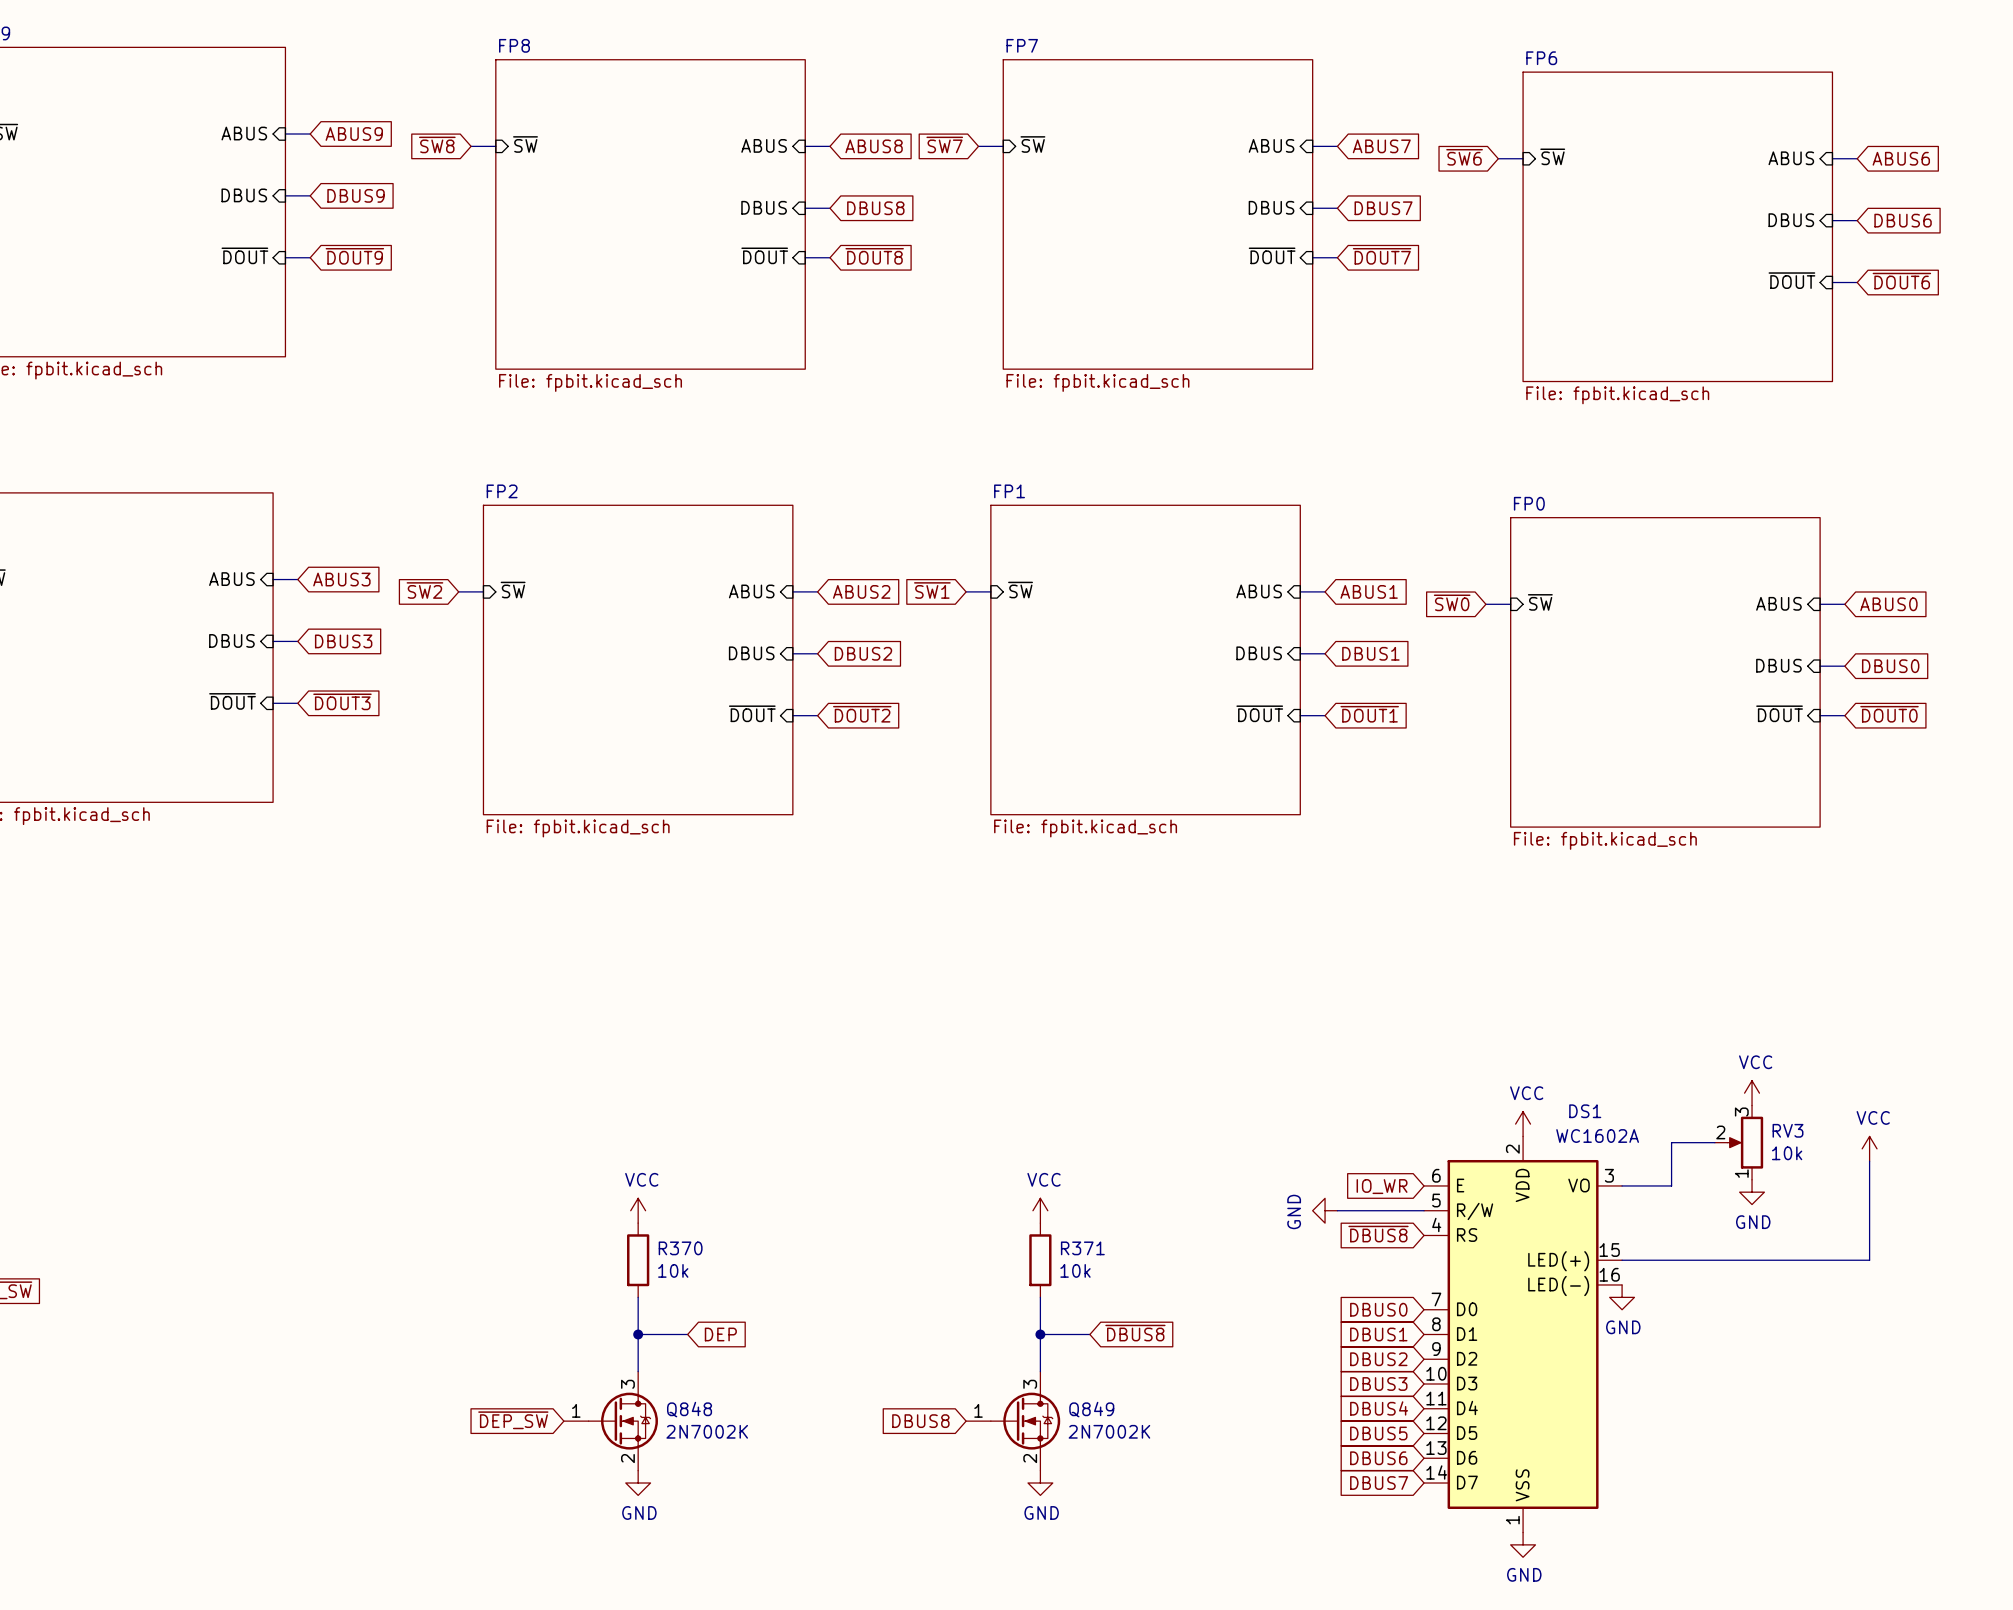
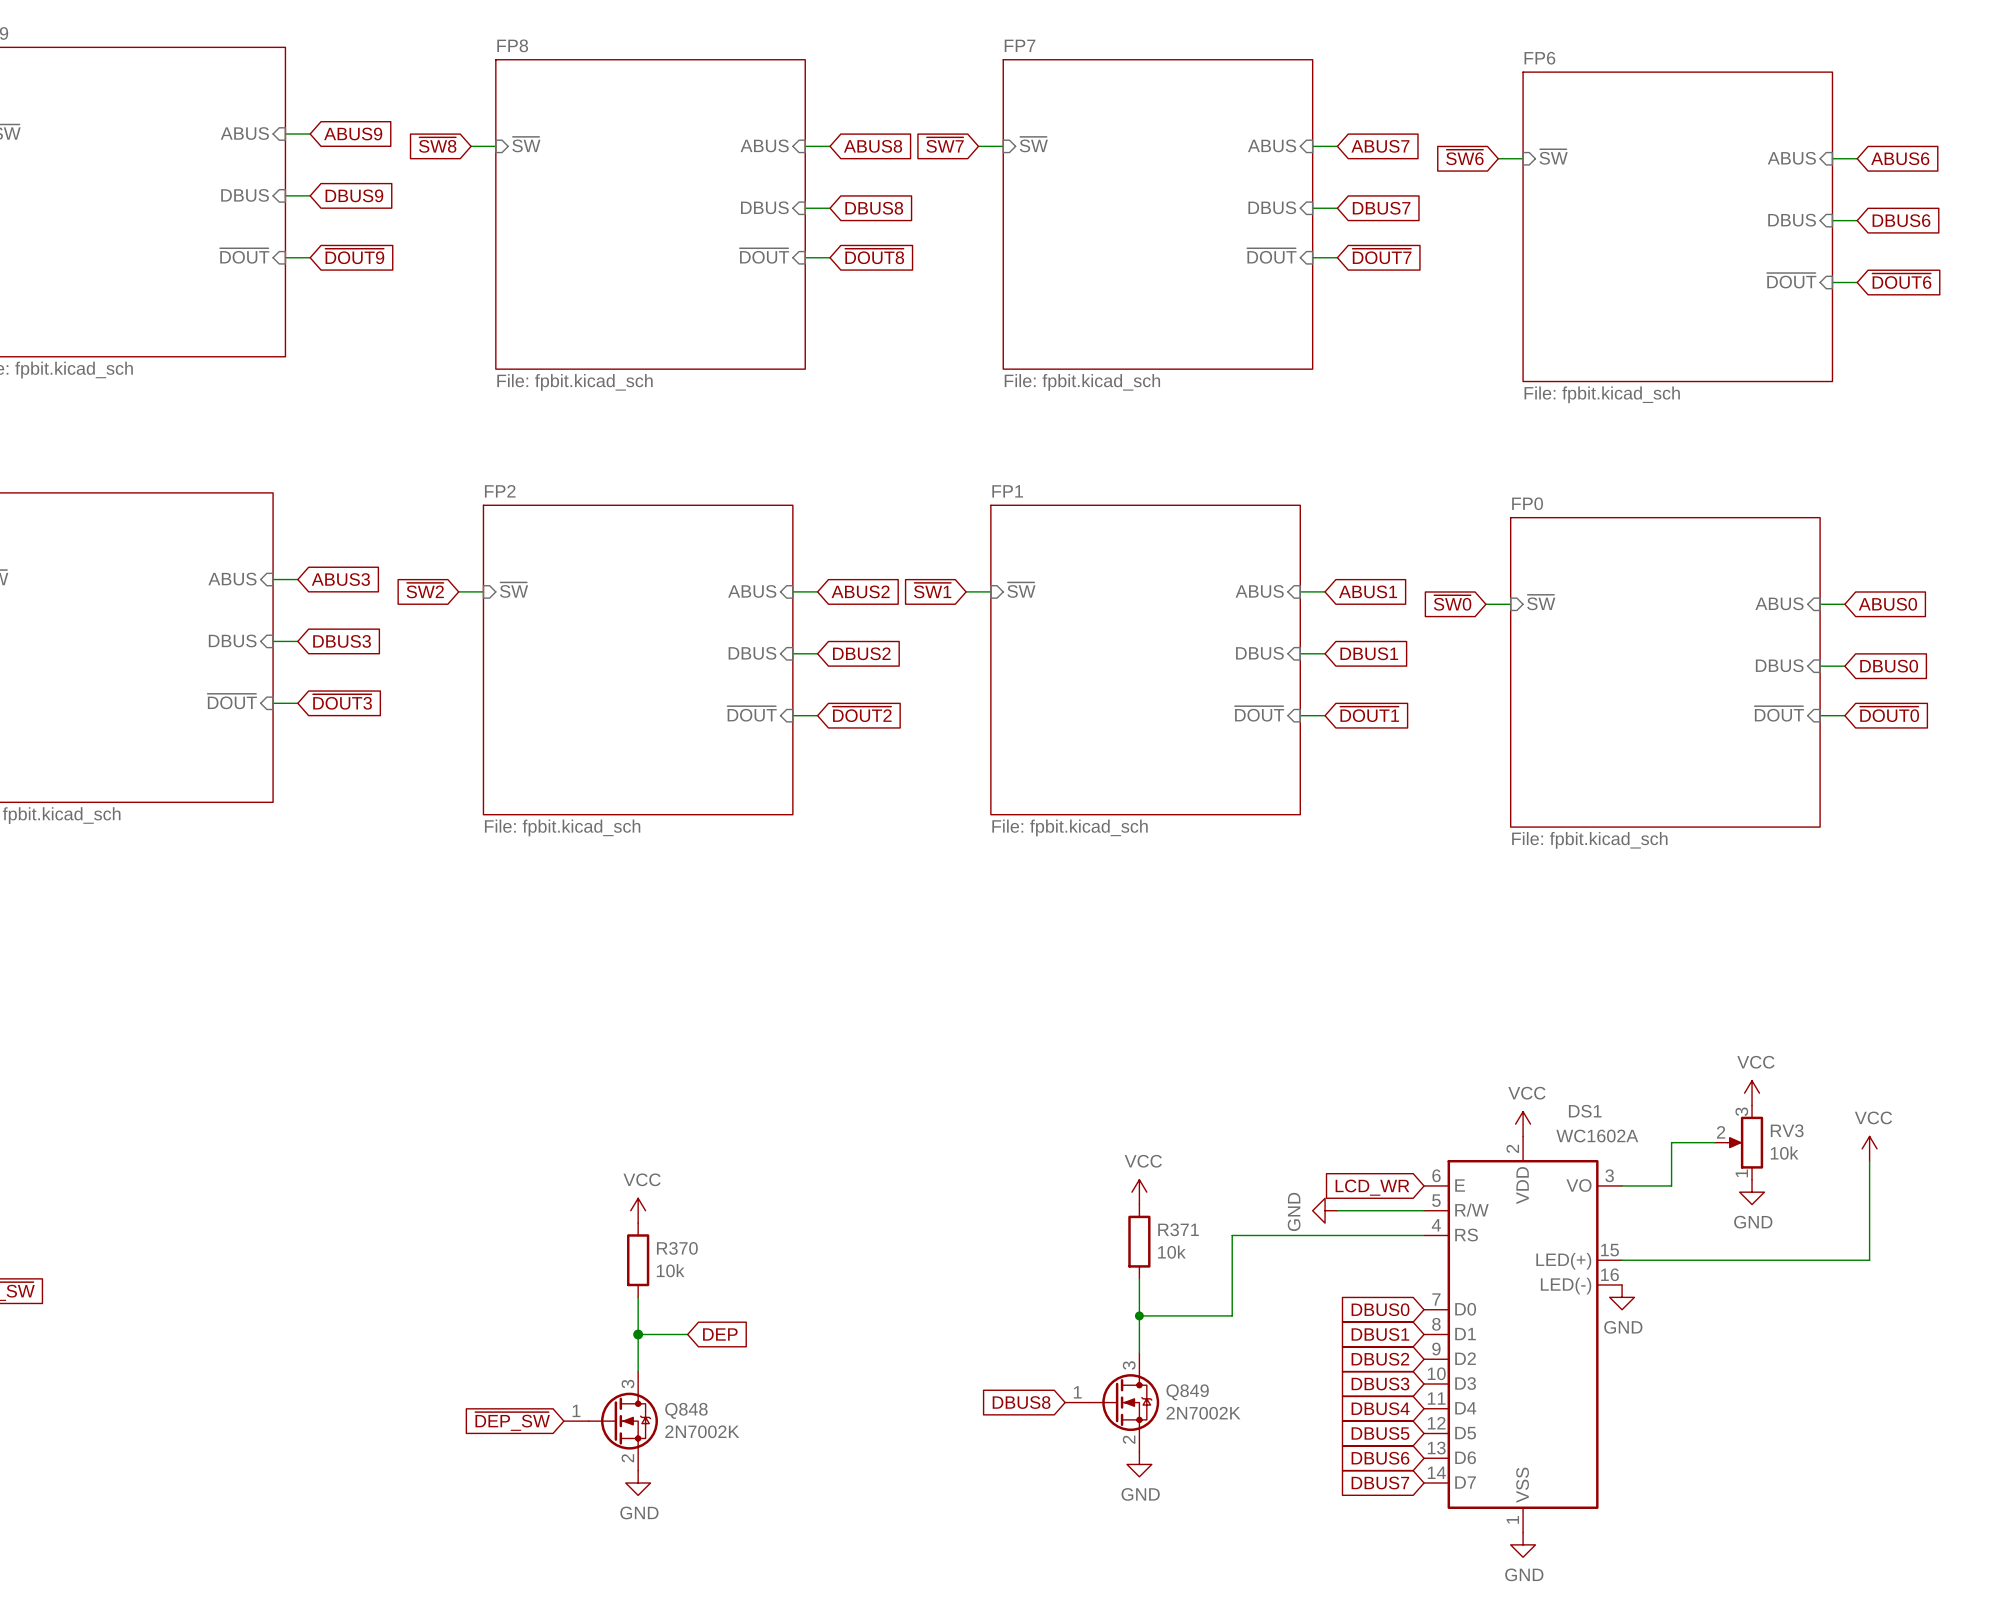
global label: IO_WR (1382, 1186) -> LCD_WR (1372, 1187)
power symbol position: VCC (1040, 1210) -> VCC (1139, 1192)
global label: ~{DBUS8} (1378, 1234) -> none
wire: none -> (1424, 1235) (1232, 1235) (1232, 1315) (1139, 1315)
R371 position: (1040, 1260) -> (1139, 1241)
wire: (1040, 1297) (1040, 1371) -> (1139, 1278) (1139, 1353)
junction: none -> (1139, 1315)
global label: ~{DBUS8} (1135, 1333) -> none
wire: (1040, 1334) (1089, 1334) -> none
junction: (1040, 1334) -> none
global label position: DBUS8 (920, 1421) -> DBUS8 (1021, 1402)
Q849 position: (1013, 1421) -> (1112, 1402)
power symbol position: GND (1040, 1483) -> GND (1139, 1464)

